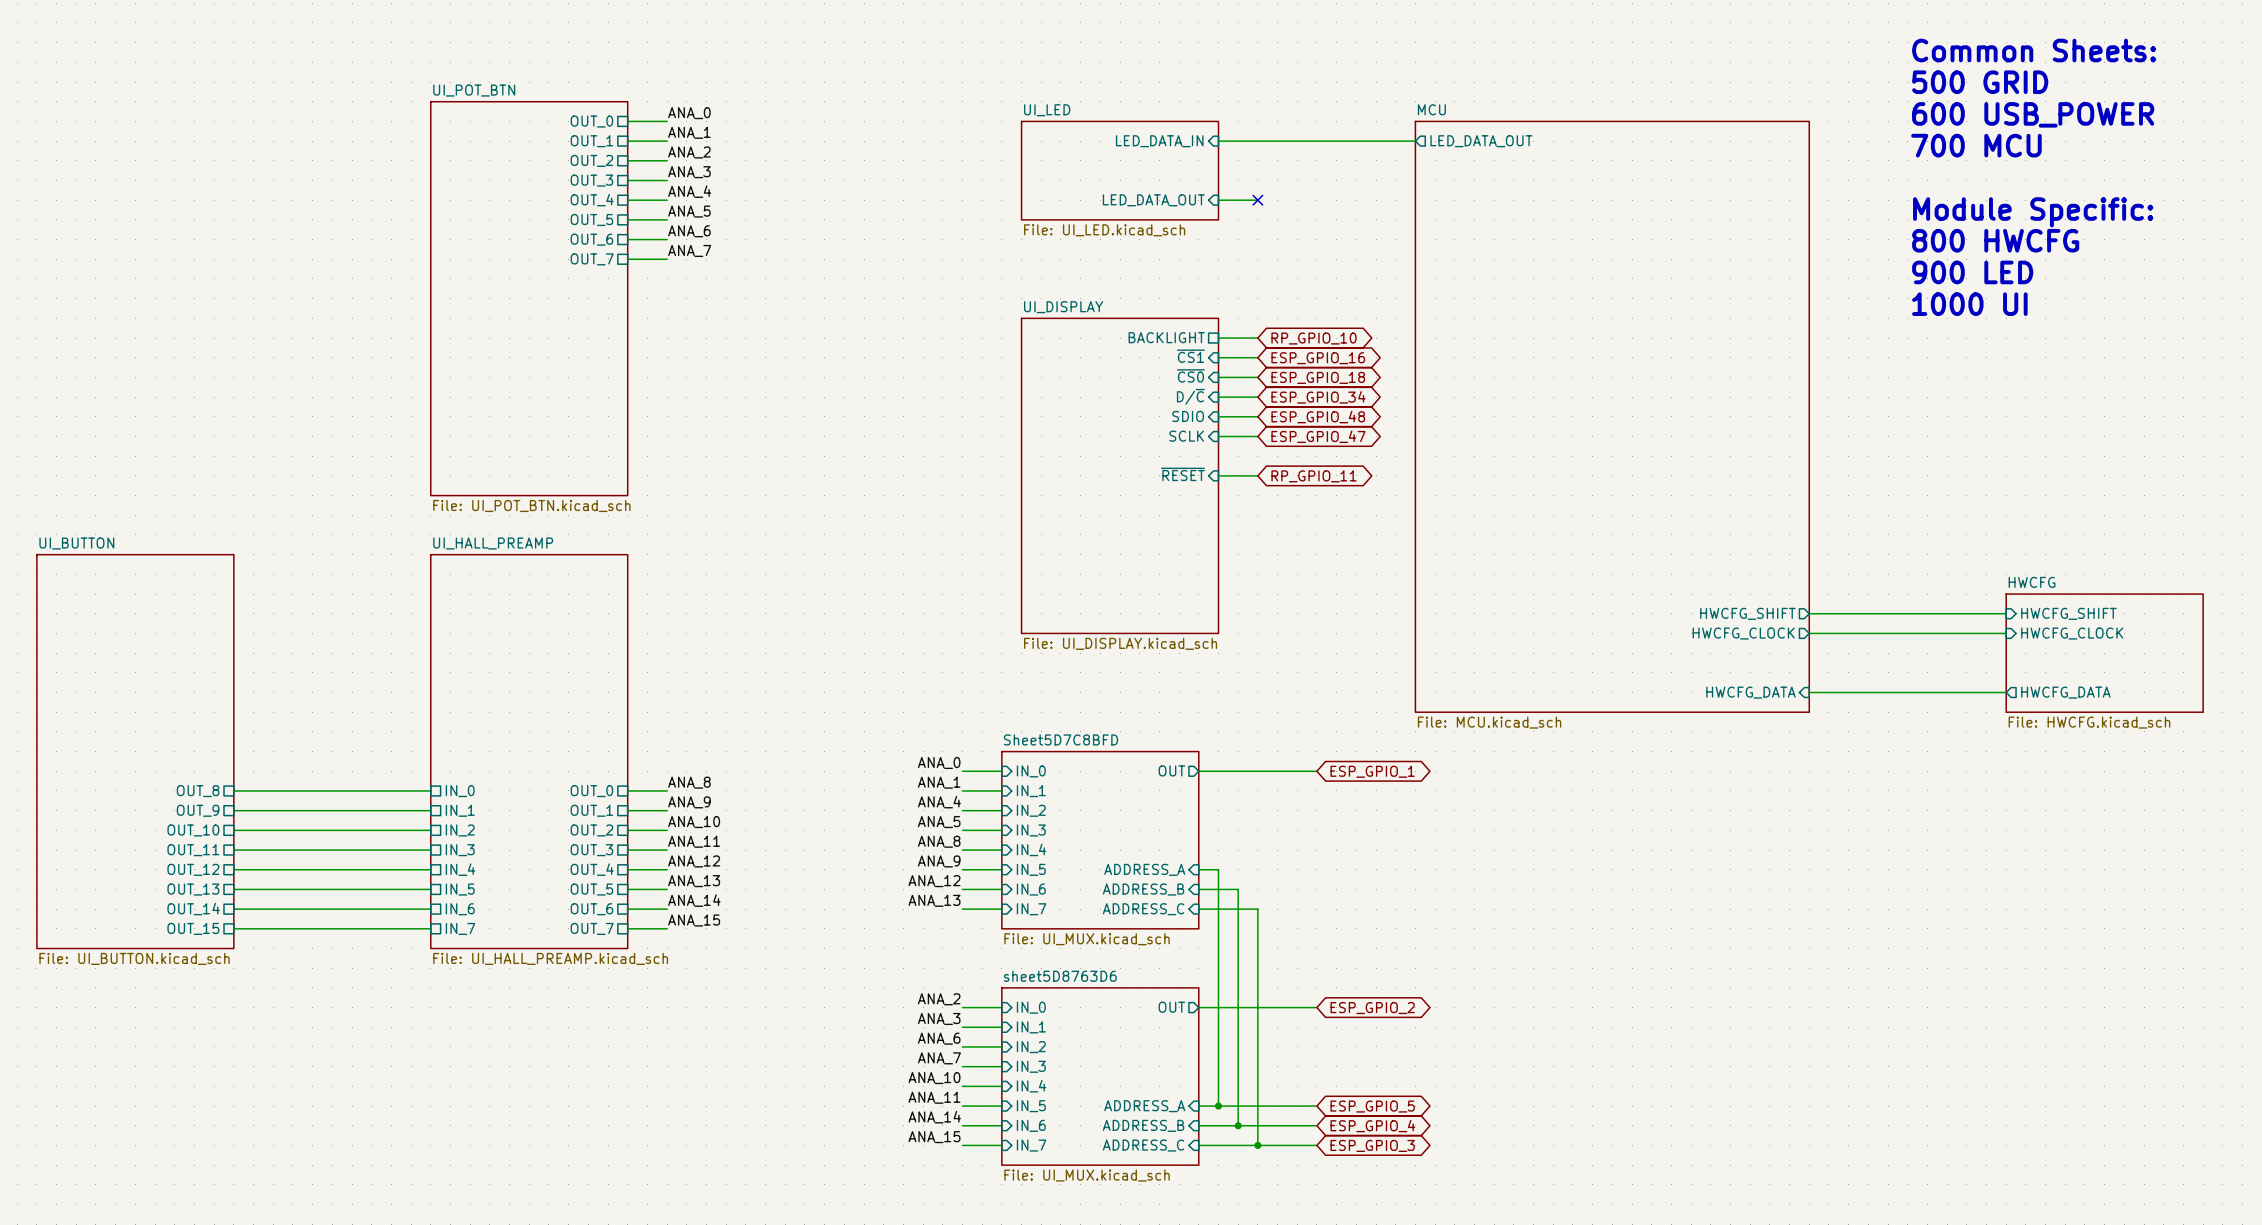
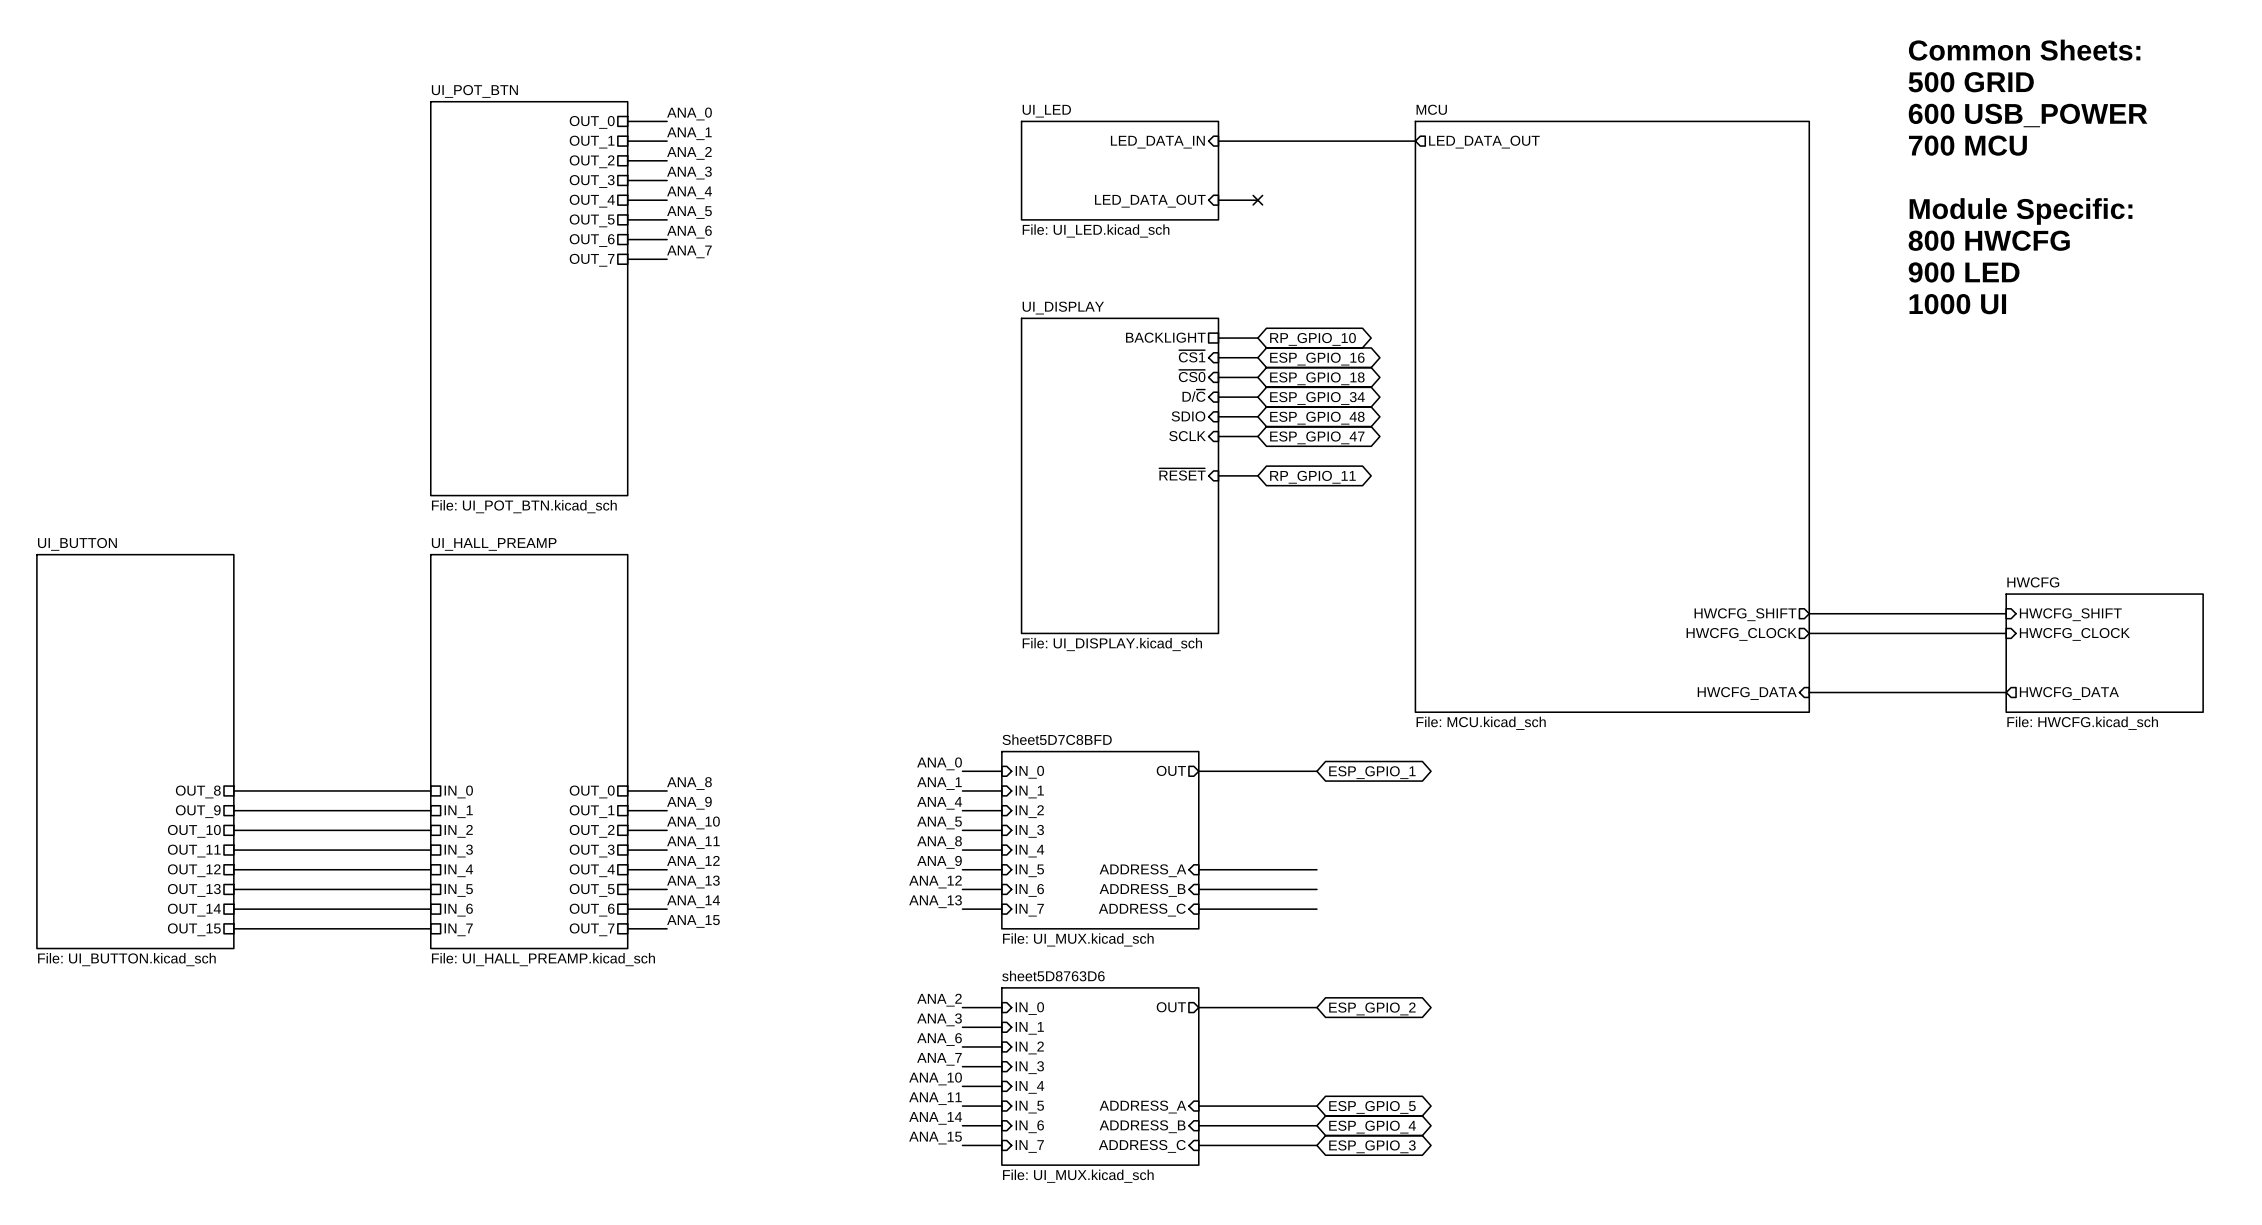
wire: (1218, 869) (1218, 1106) -> (1218, 869) (1316, 869)
wire: (1238, 889) (1238, 1125) -> (1238, 889) (1316, 889)
wire: (1257, 909) (1257, 1145) -> (1257, 909) (1316, 909)
junction: (1218, 1106) -> none
junction: (1238, 1125) -> none
junction: (1257, 1145) -> none

